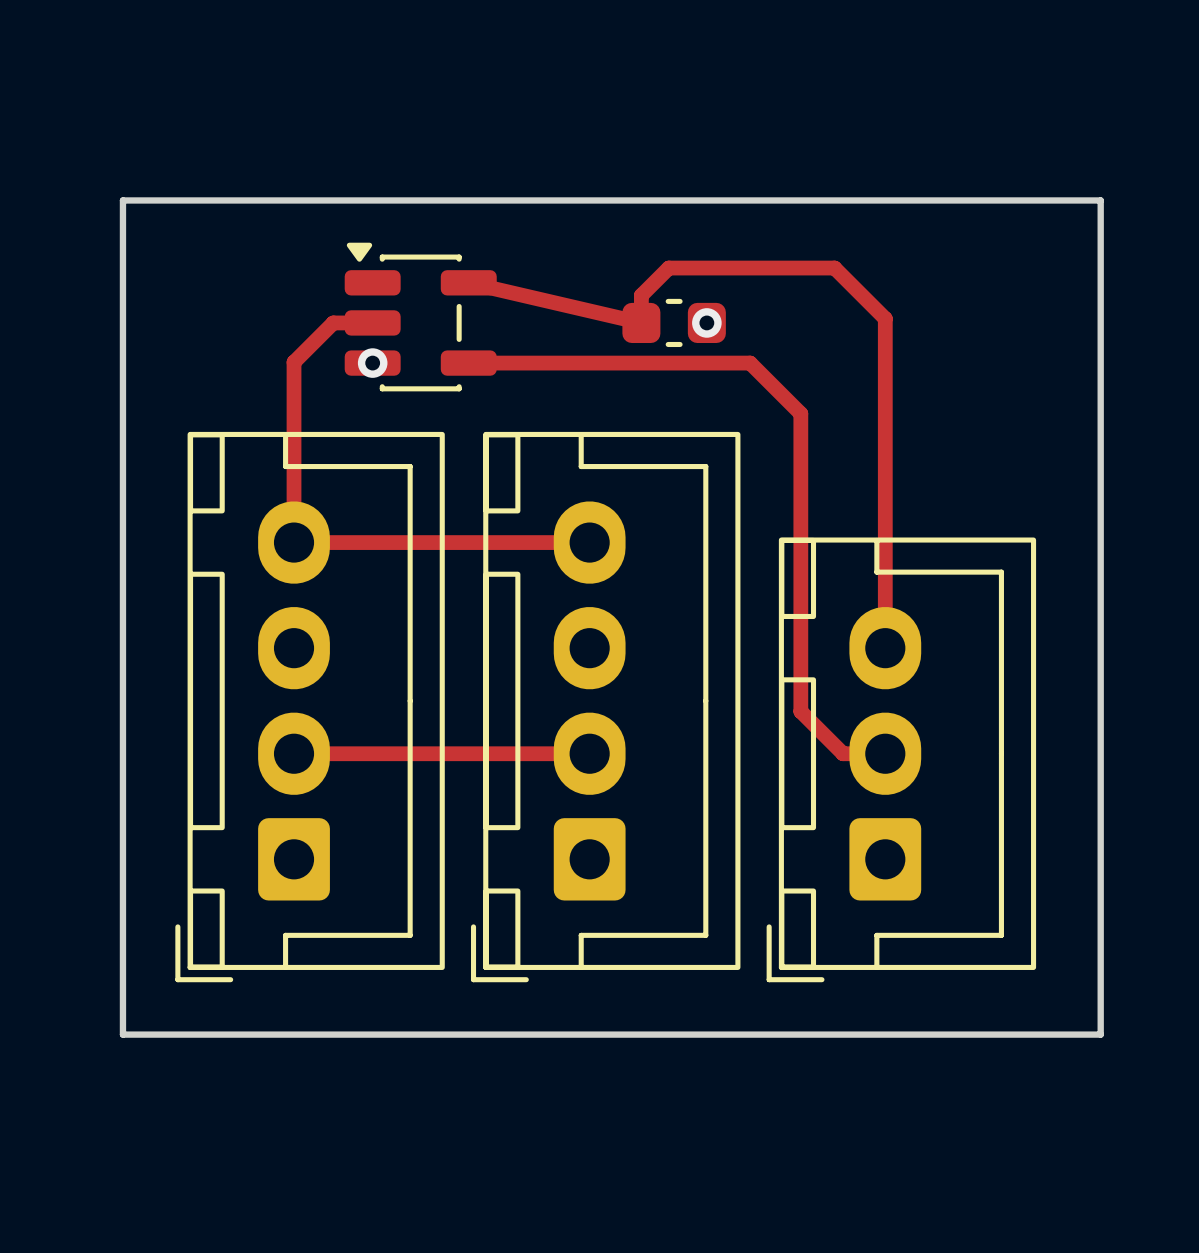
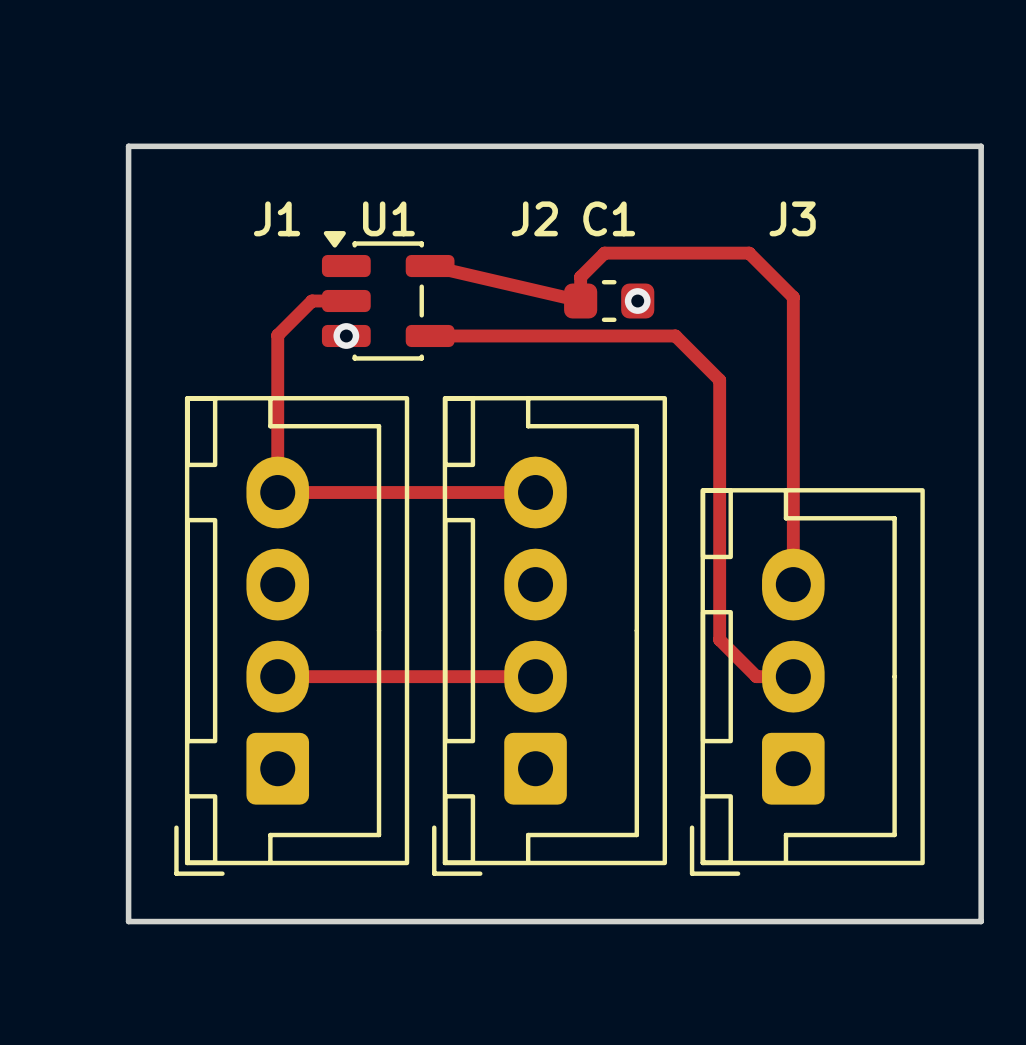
board edge: (122, 200) (1100, 200) -> (128, 194) (128, 146) (981, 146) (981, 194)
text: none -> J1 (277, 218)
text: none -> U1 (388, 218)
text: none -> J2 (534, 218)
text: none -> C1 (609, 218)
text: none -> J3 (792, 218)

